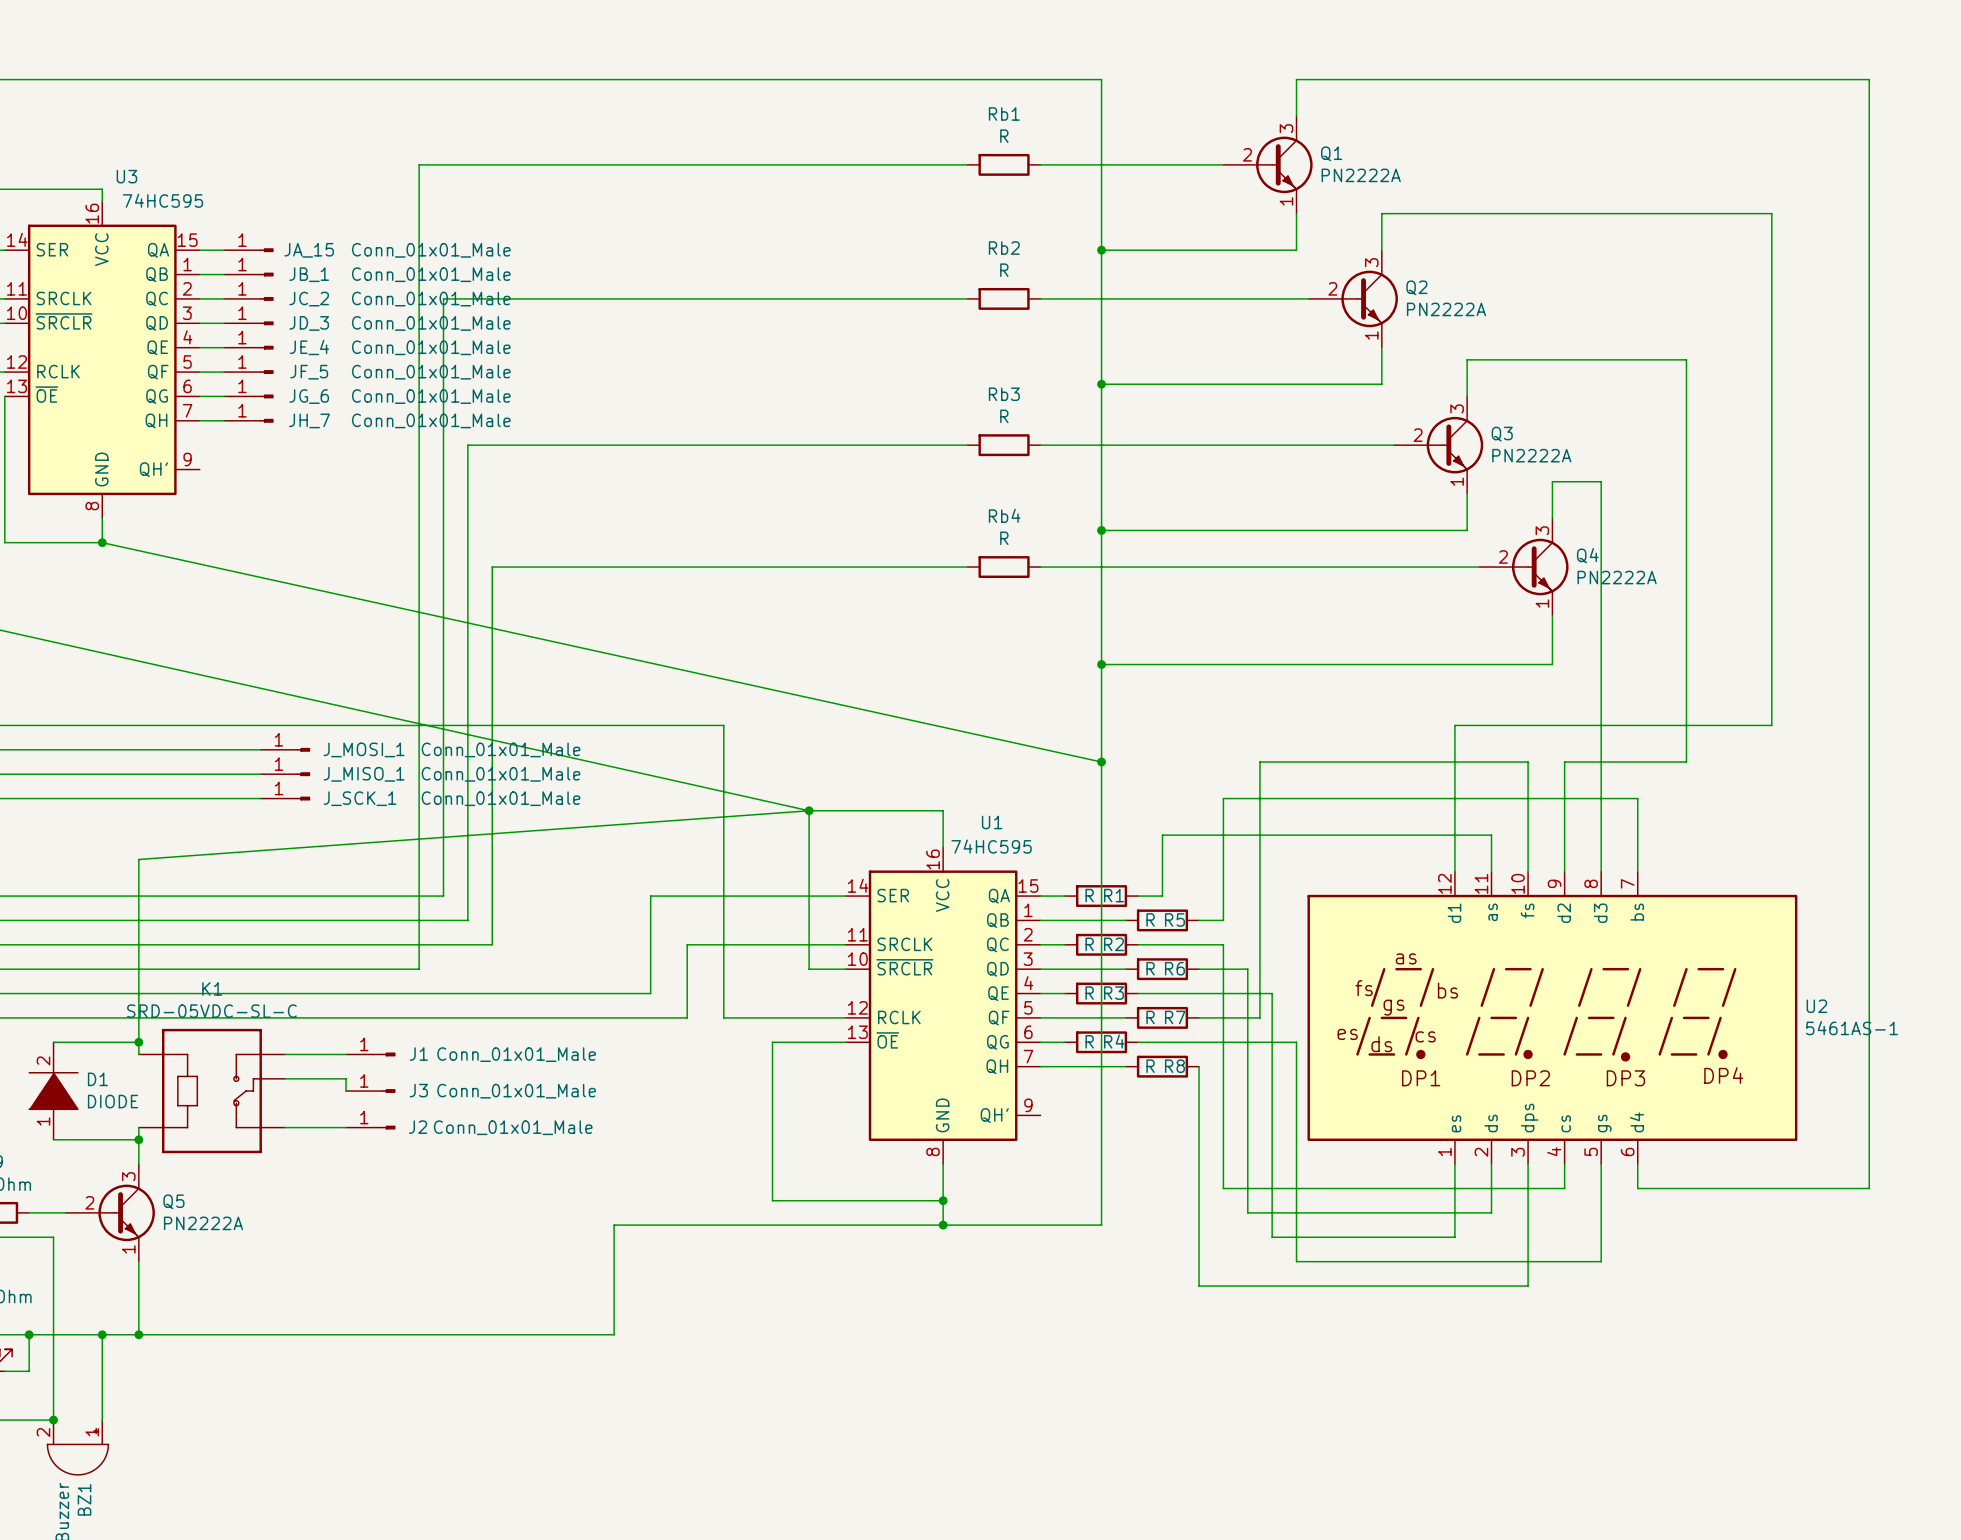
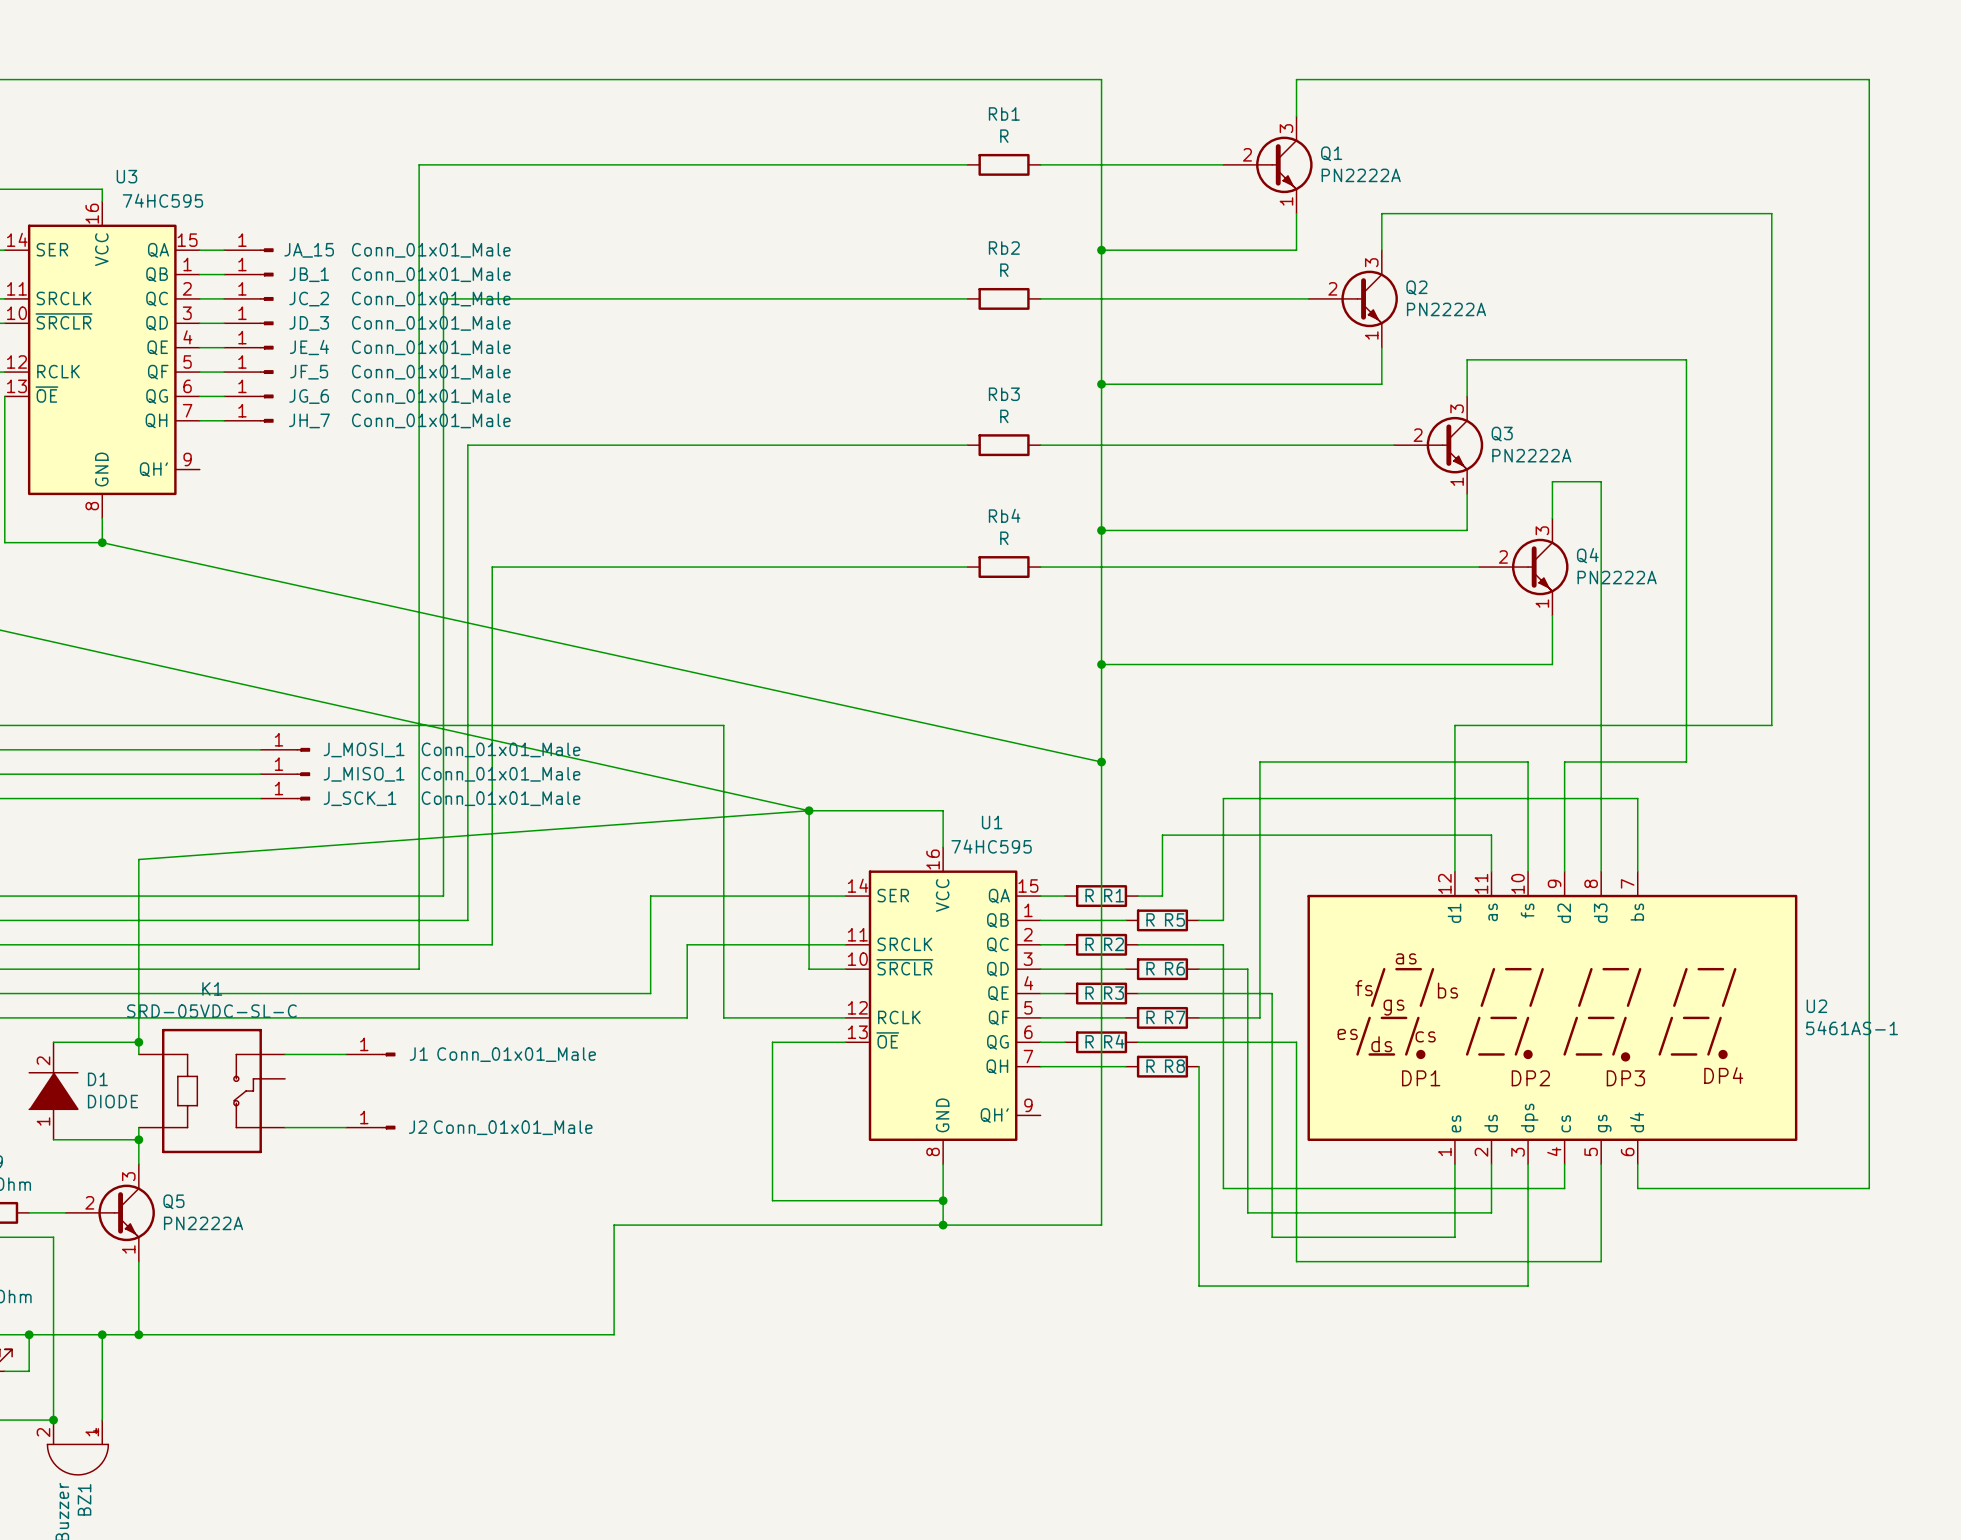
wire: (285, 1078) (346, 1078) (346, 1091) -> none
J3: Conn_01x01_Male (370, 1091) -> none

